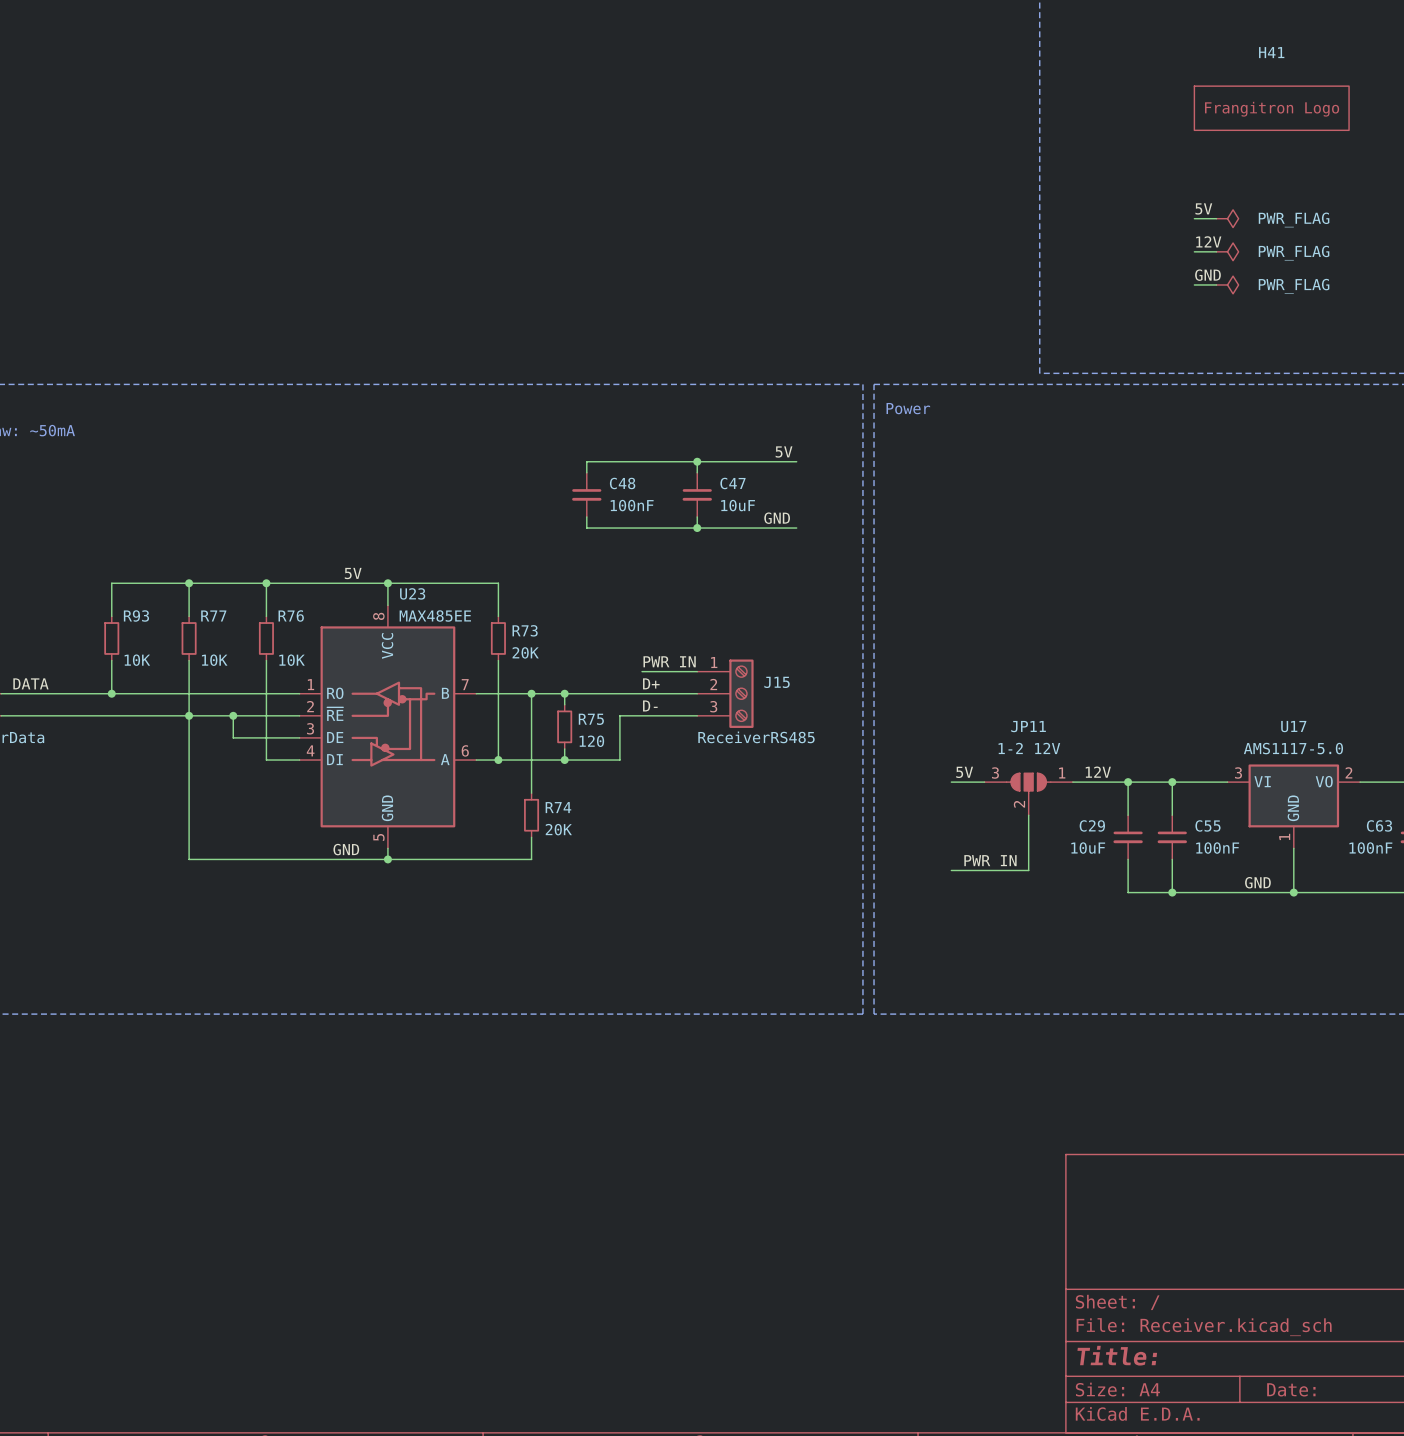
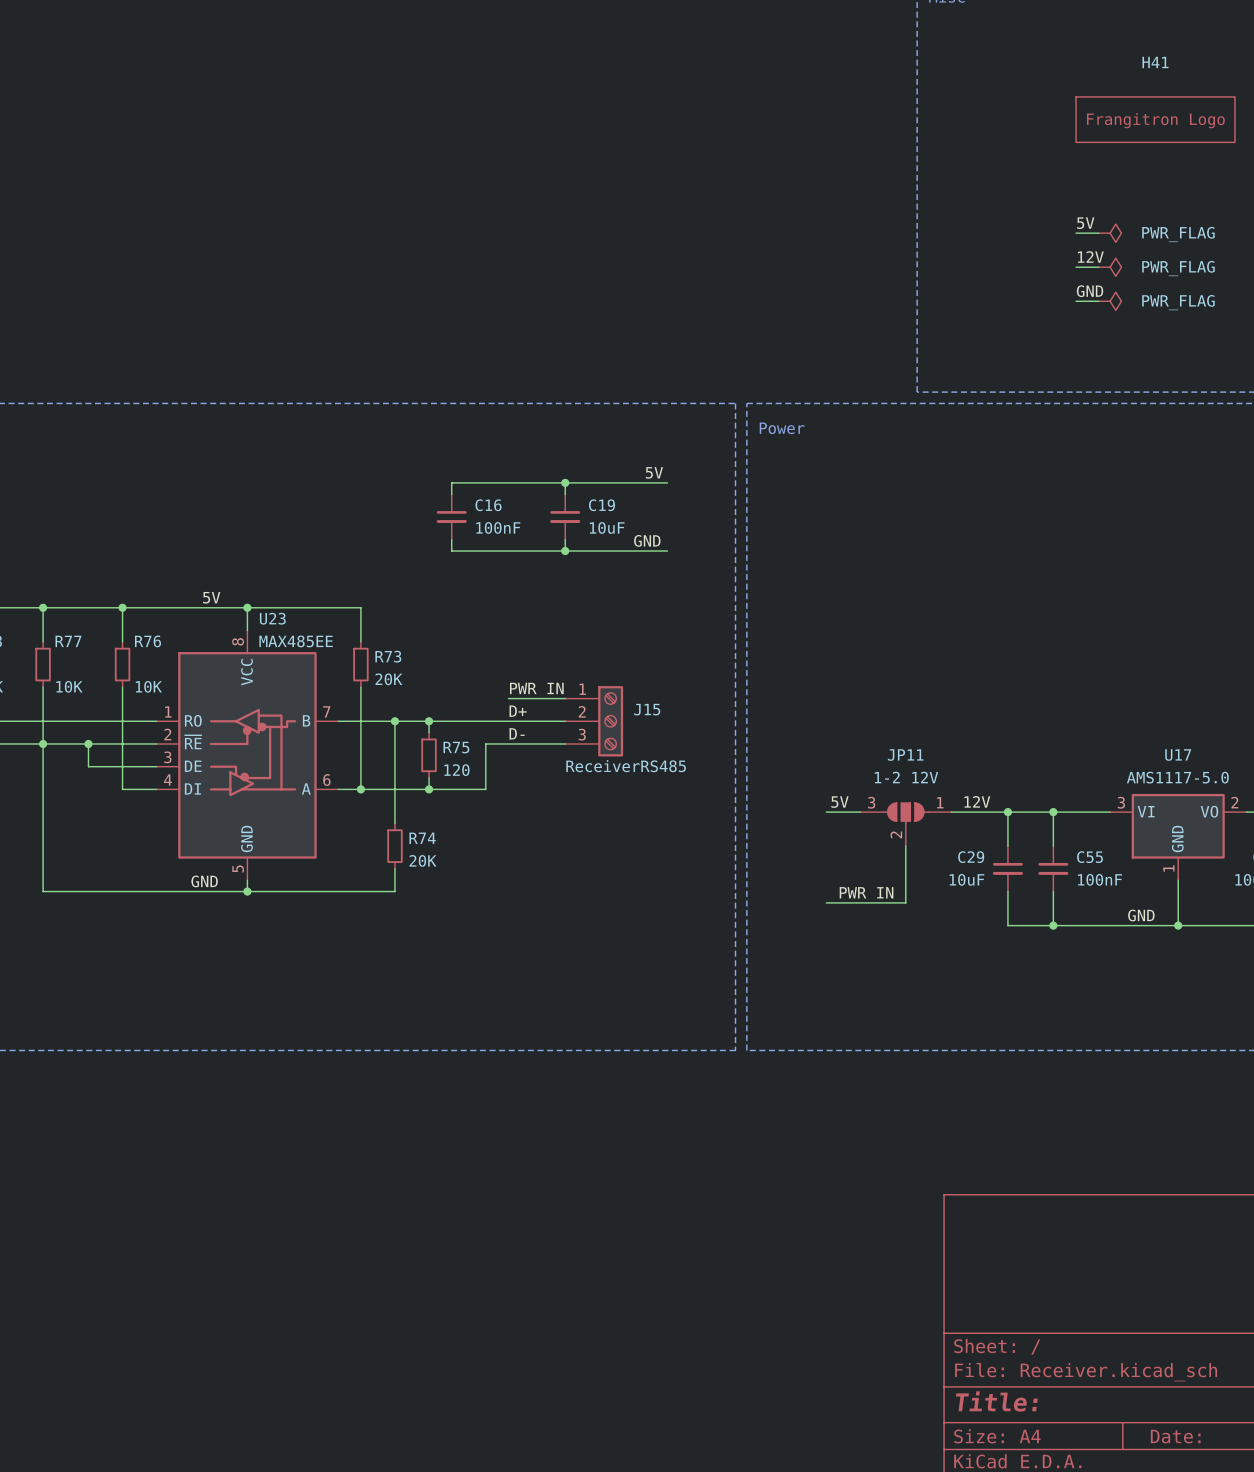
C48 name: C48 (622, 483) -> C16 (488, 505)
C47 name: C47 (732, 483) -> C19 (602, 505)

